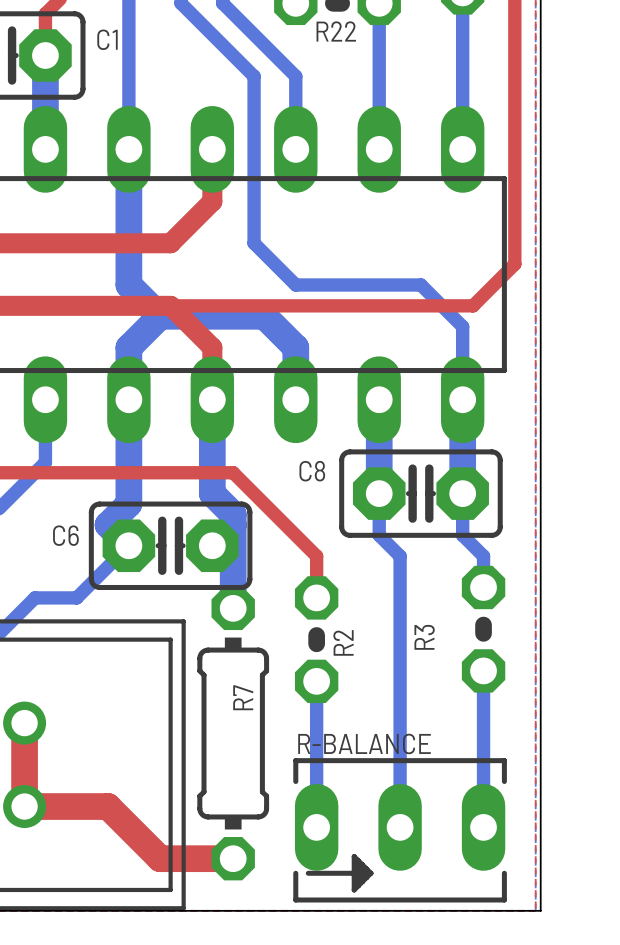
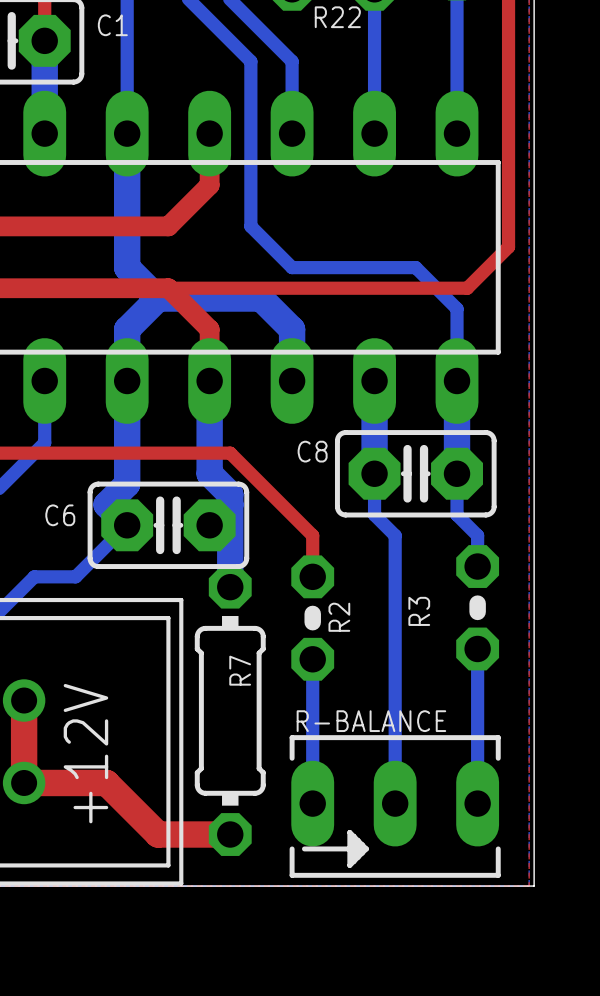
part text: none -> +12V (85, 753)

